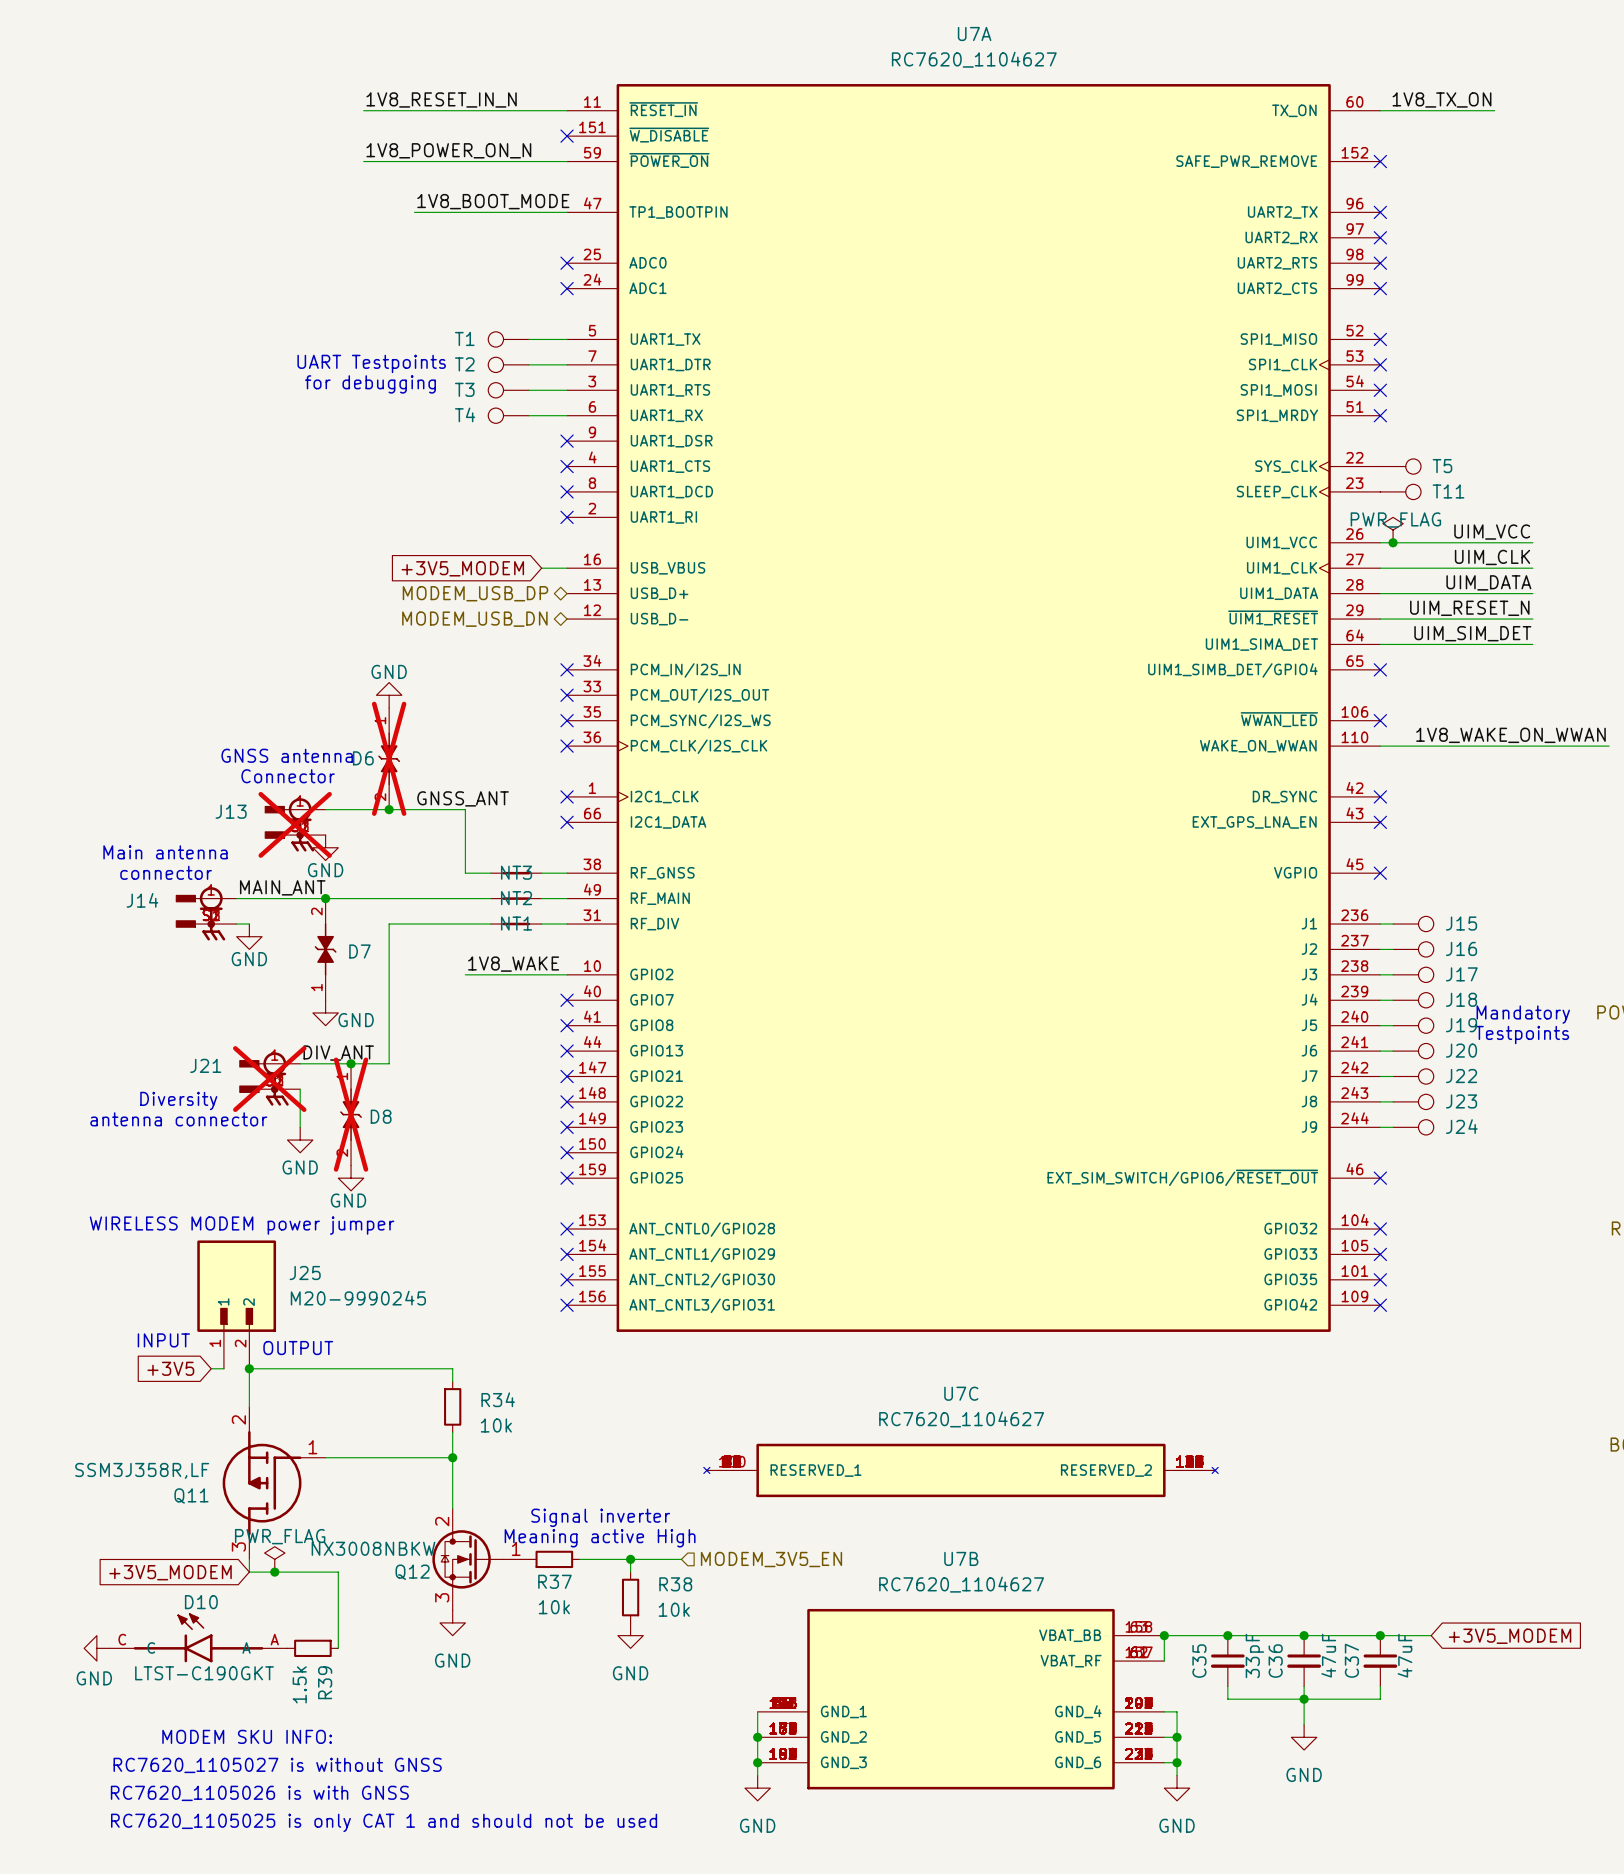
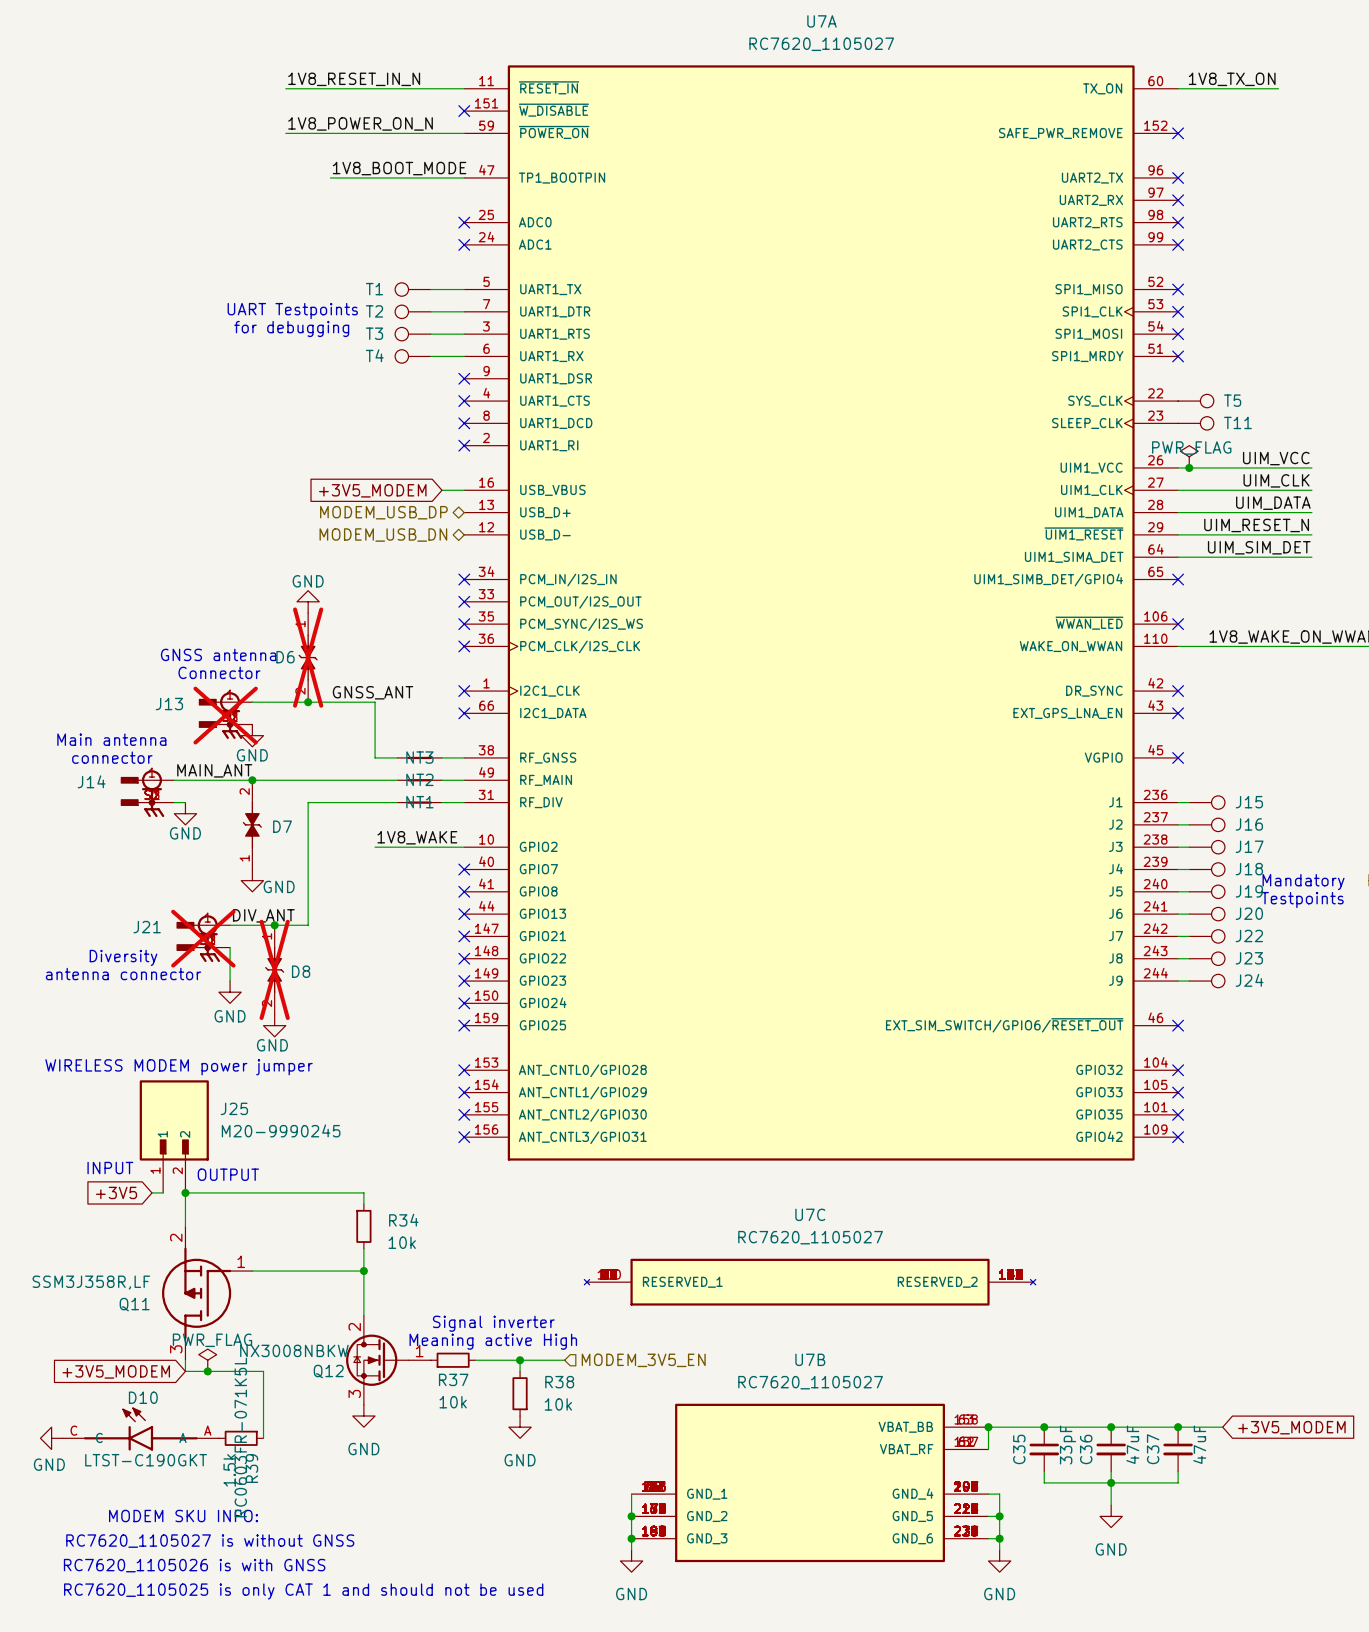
U7A value: RC7620_1104627 (974, 59) -> RC7620_1105027 (821, 44)
U7C value: RC7620_1104627 (961, 1419) -> RC7620_1105027 (810, 1237)
U7B value: RC7620_1104627 (961, 1584) -> RC7620_1105027 (810, 1382)
R39 text: none -> RC0603FR-071K5L (240, 1437)

